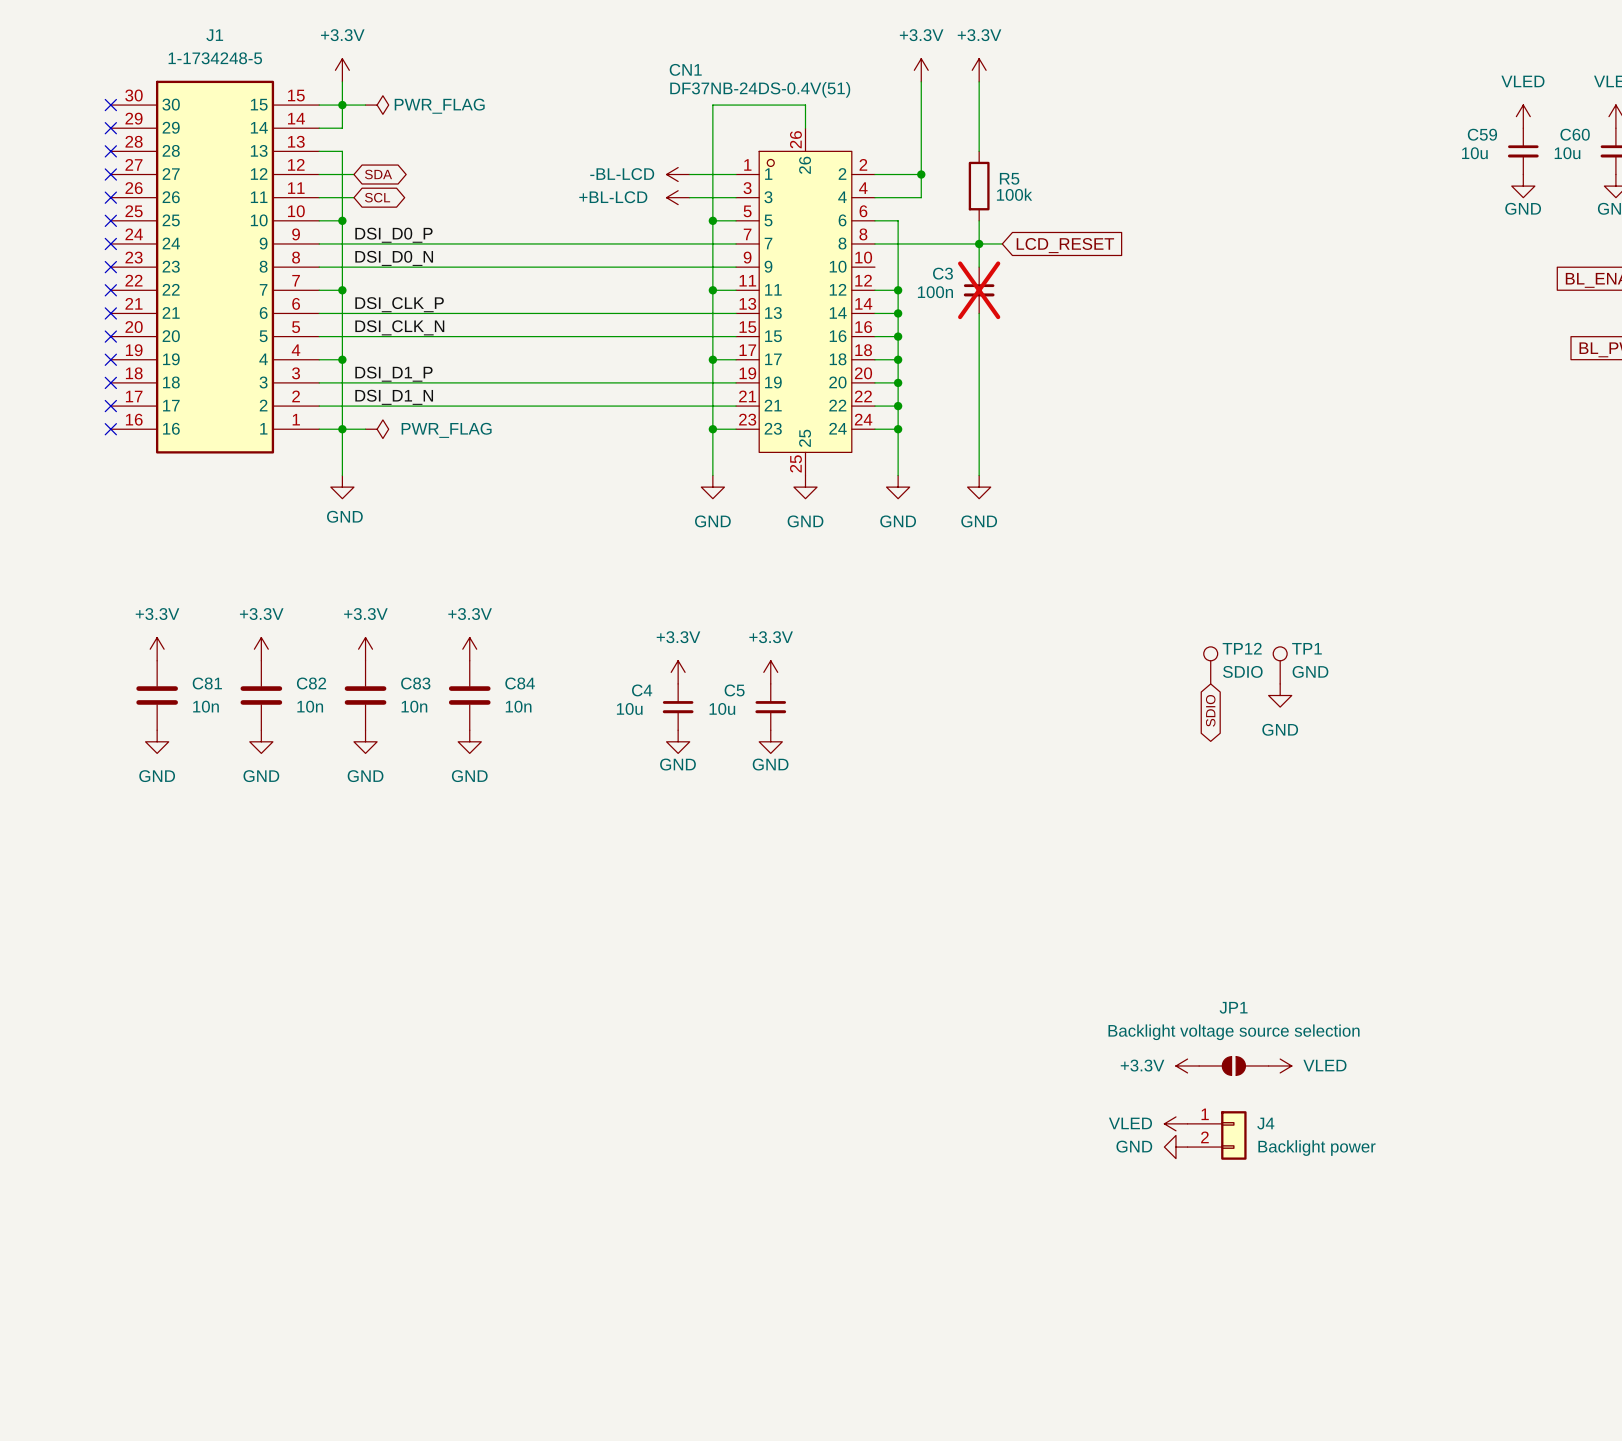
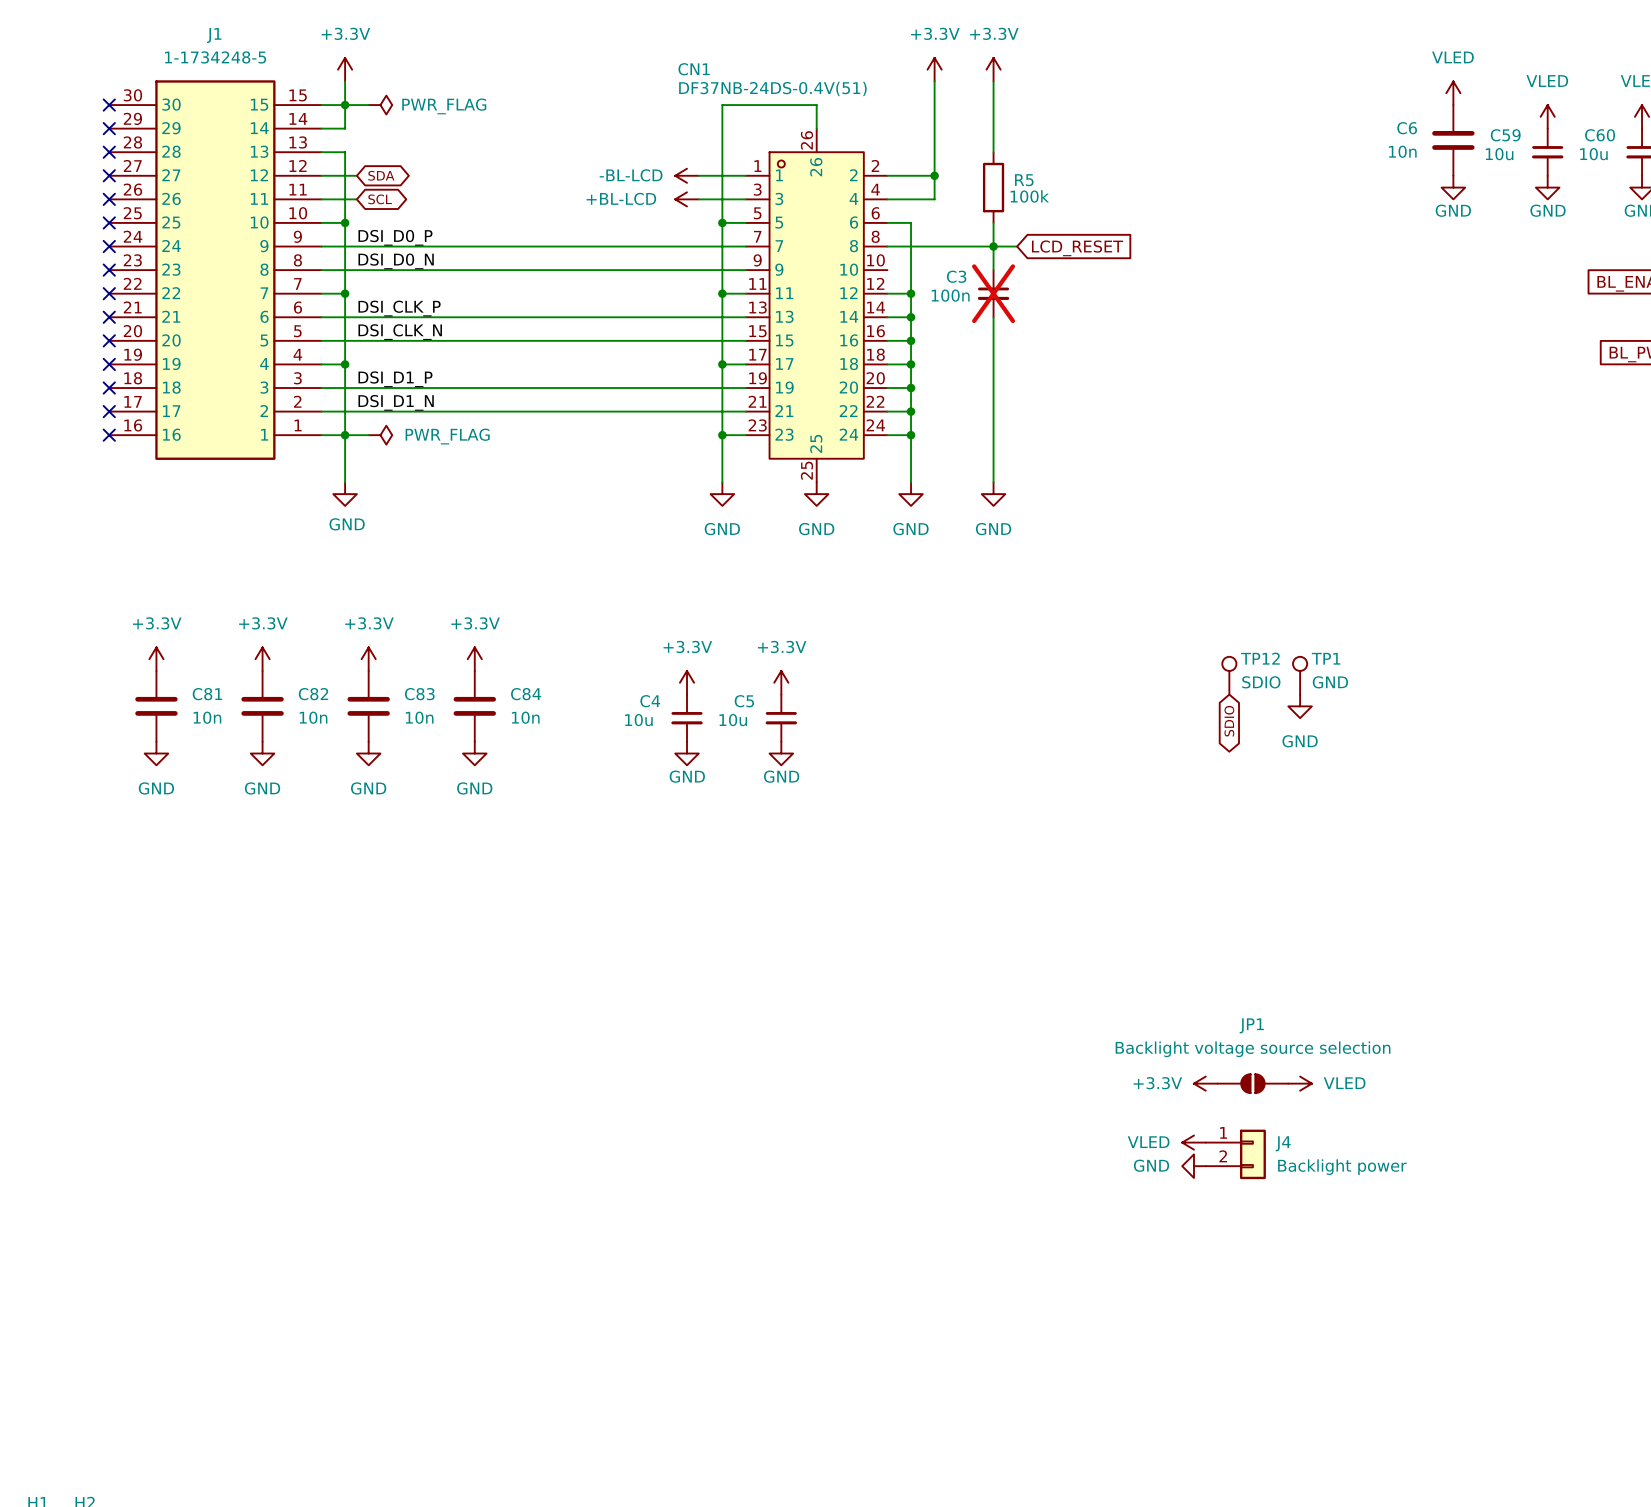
power symbol: none -> VLED (1453, 93)
C6: none -> 10n (1453, 140)
power symbol: none -> GND (1453, 187)

